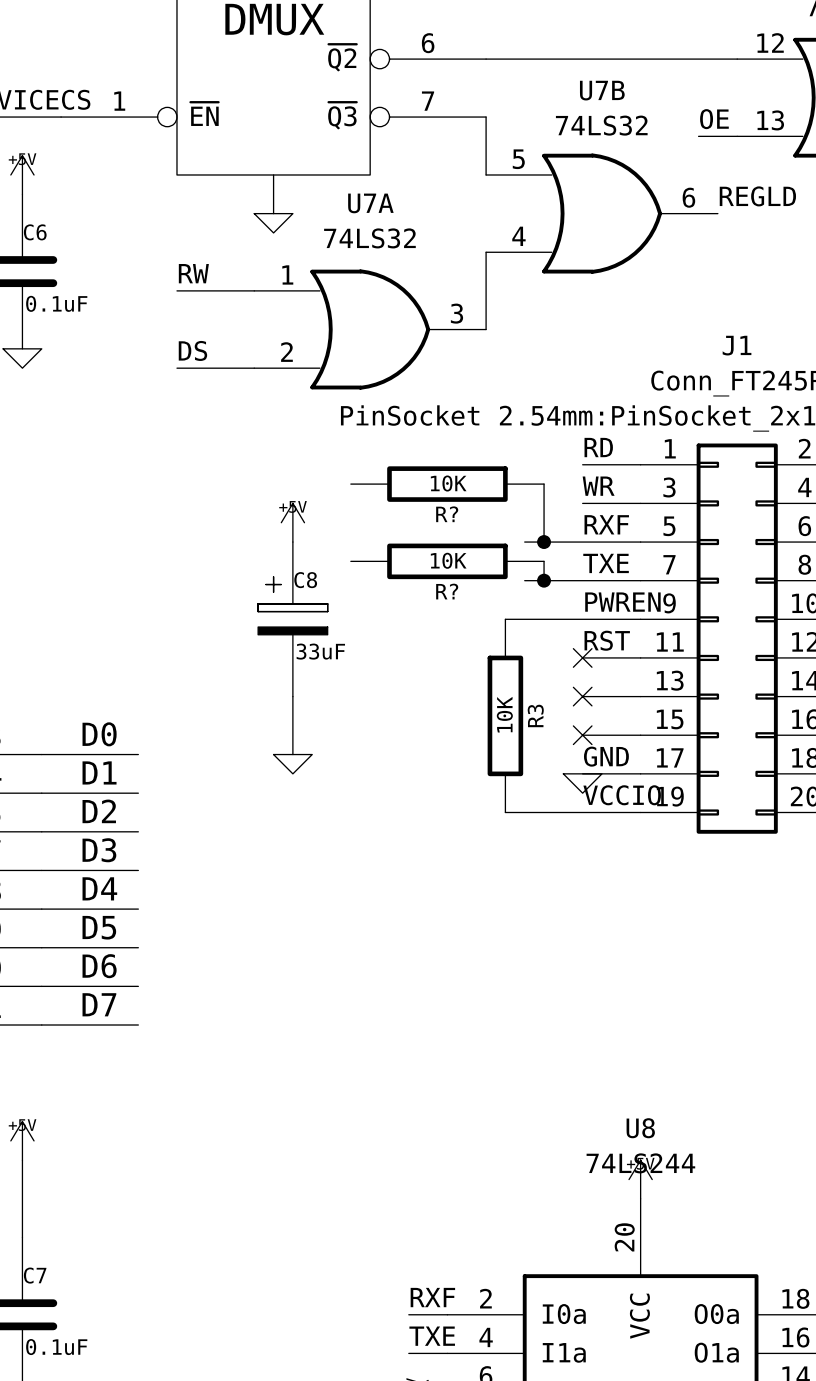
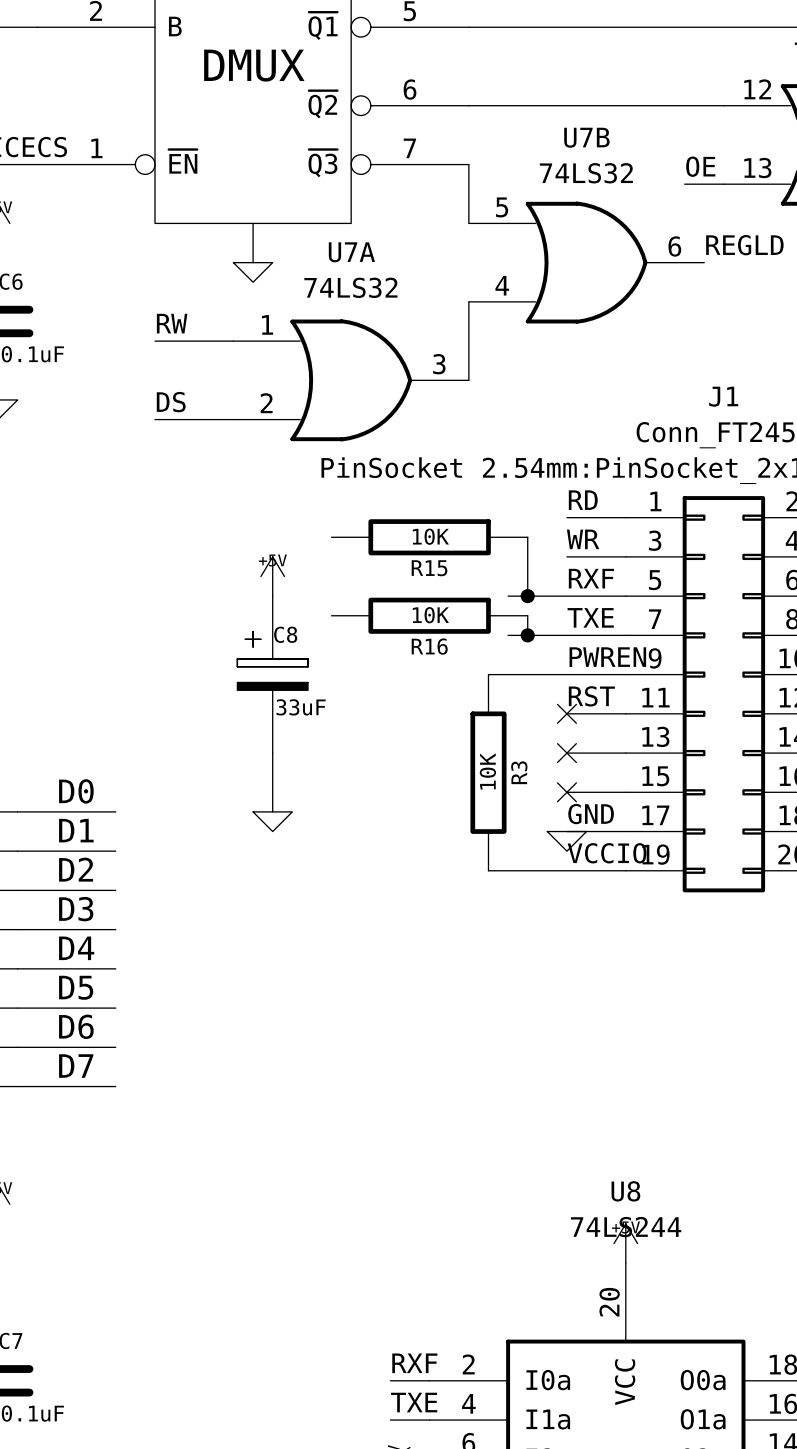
R? name: R? (447, 514) -> R15 (429, 568)
R? name: R? (447, 591) -> R16 (429, 646)

